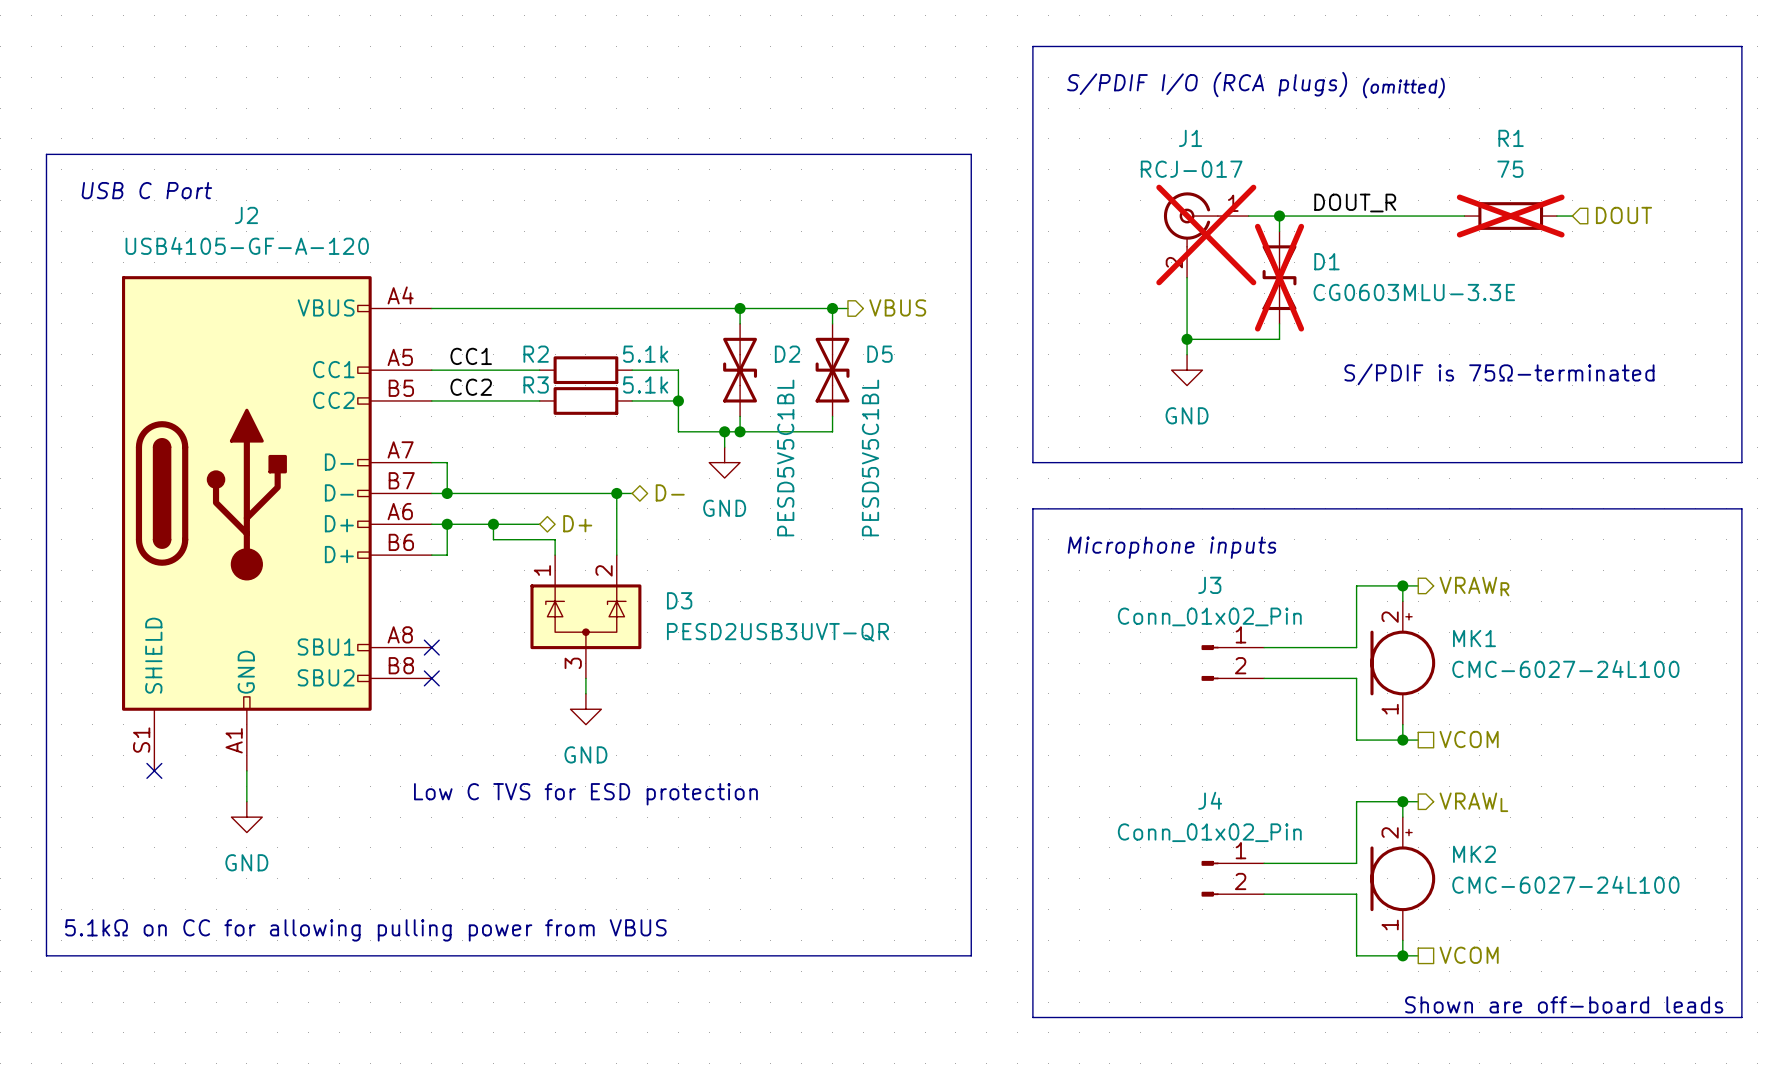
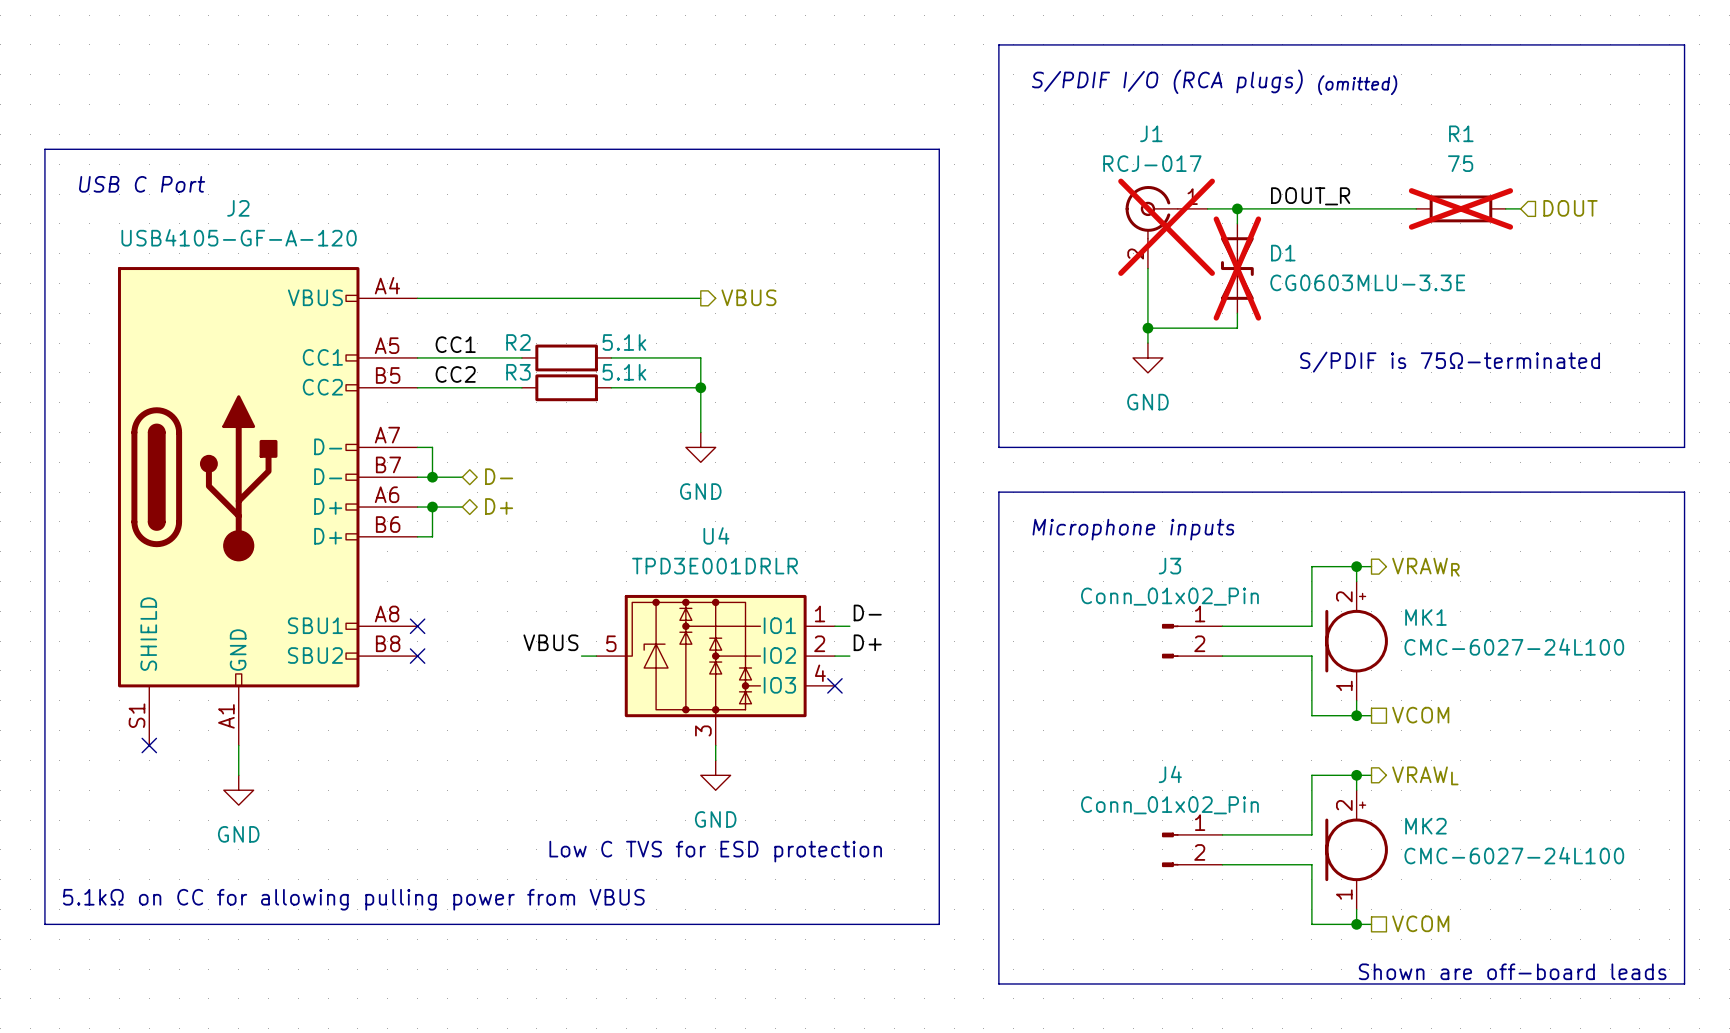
hierarchical label position: VBUS (897, 307) -> VBUS (748, 297)
wire: (724, 308) (847, 308) -> none
wire: (740, 308) (740, 323) -> none
junction: (740, 308) -> none
wire: (832, 308) (832, 323) -> none
junction: (832, 308) -> none
wire: (678, 370) (678, 431) (832, 431) (832, 416) -> (656, 357) (700, 357) (700, 417)
D2: PESD5V5C1BL (740, 370) -> none
D5: PESD5V5C1BL (832, 370) -> none
wire: none -> (656, 387) (700, 387)
junction: (678, 400) -> none
junction: none -> (700, 387)
wire: (740, 416) (740, 431) -> none
junction: (724, 431) -> none
junction: (740, 431) -> none
hierarchical label position: D- (670, 492) -> D- (499, 476)
wire: (478, 493) (632, 493) -> none
wire: (616, 493) (616, 555) -> none
junction: (616, 493) -> none
hierarchical label position: D+ (577, 523) -> D+ (499, 506)
wire: (478, 524) (539, 524) -> none
wire: (493, 524) (493, 539) (555, 539) (555, 555) -> none
junction: (493, 524) -> none
D3: PESD2USB3UVT-QR (585, 616) -> none
label: none -> D- (867, 612)
wire: none -> (834, 626) (849, 626)
label: none -> VBUS (550, 642)
label: none -> D+ (867, 642)
wire: (585, 678) (585, 693) -> (715, 745) (715, 760)
wire: none -> (581, 656) (596, 656)
wire: none -> (834, 656) (849, 656)
U4: none -> TPD3E001DRLR (715, 670)
power symbol position: GND (585, 709) -> GND (715, 775)
no-connect mark: none -> (834, 685)
text position: Low C TVS for ESD protection (585, 794) -> Low C TVS for ESD protection (715, 851)

